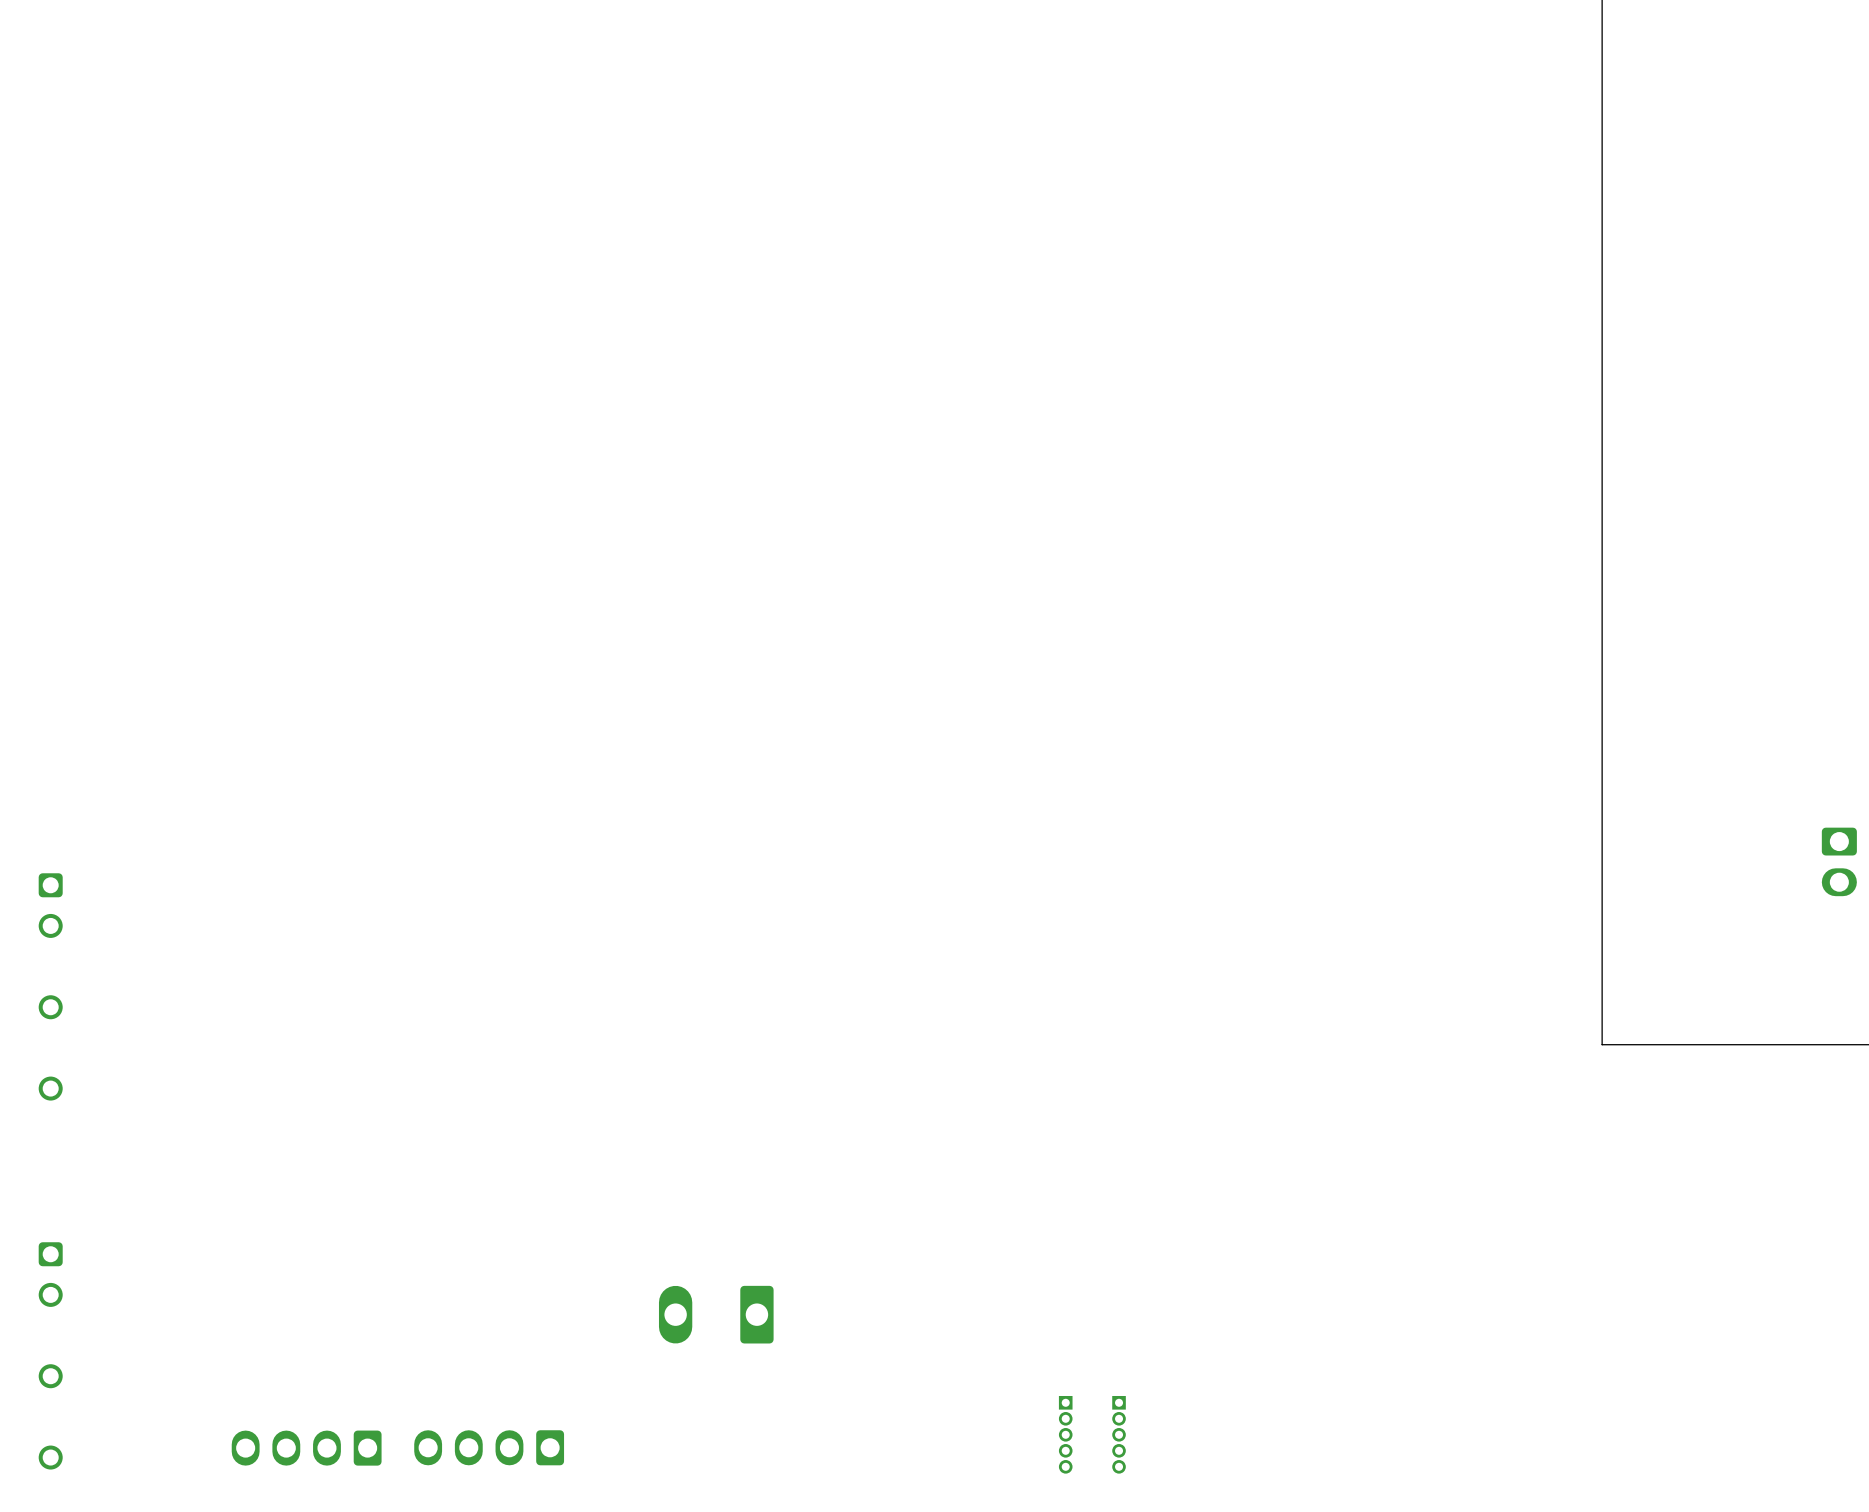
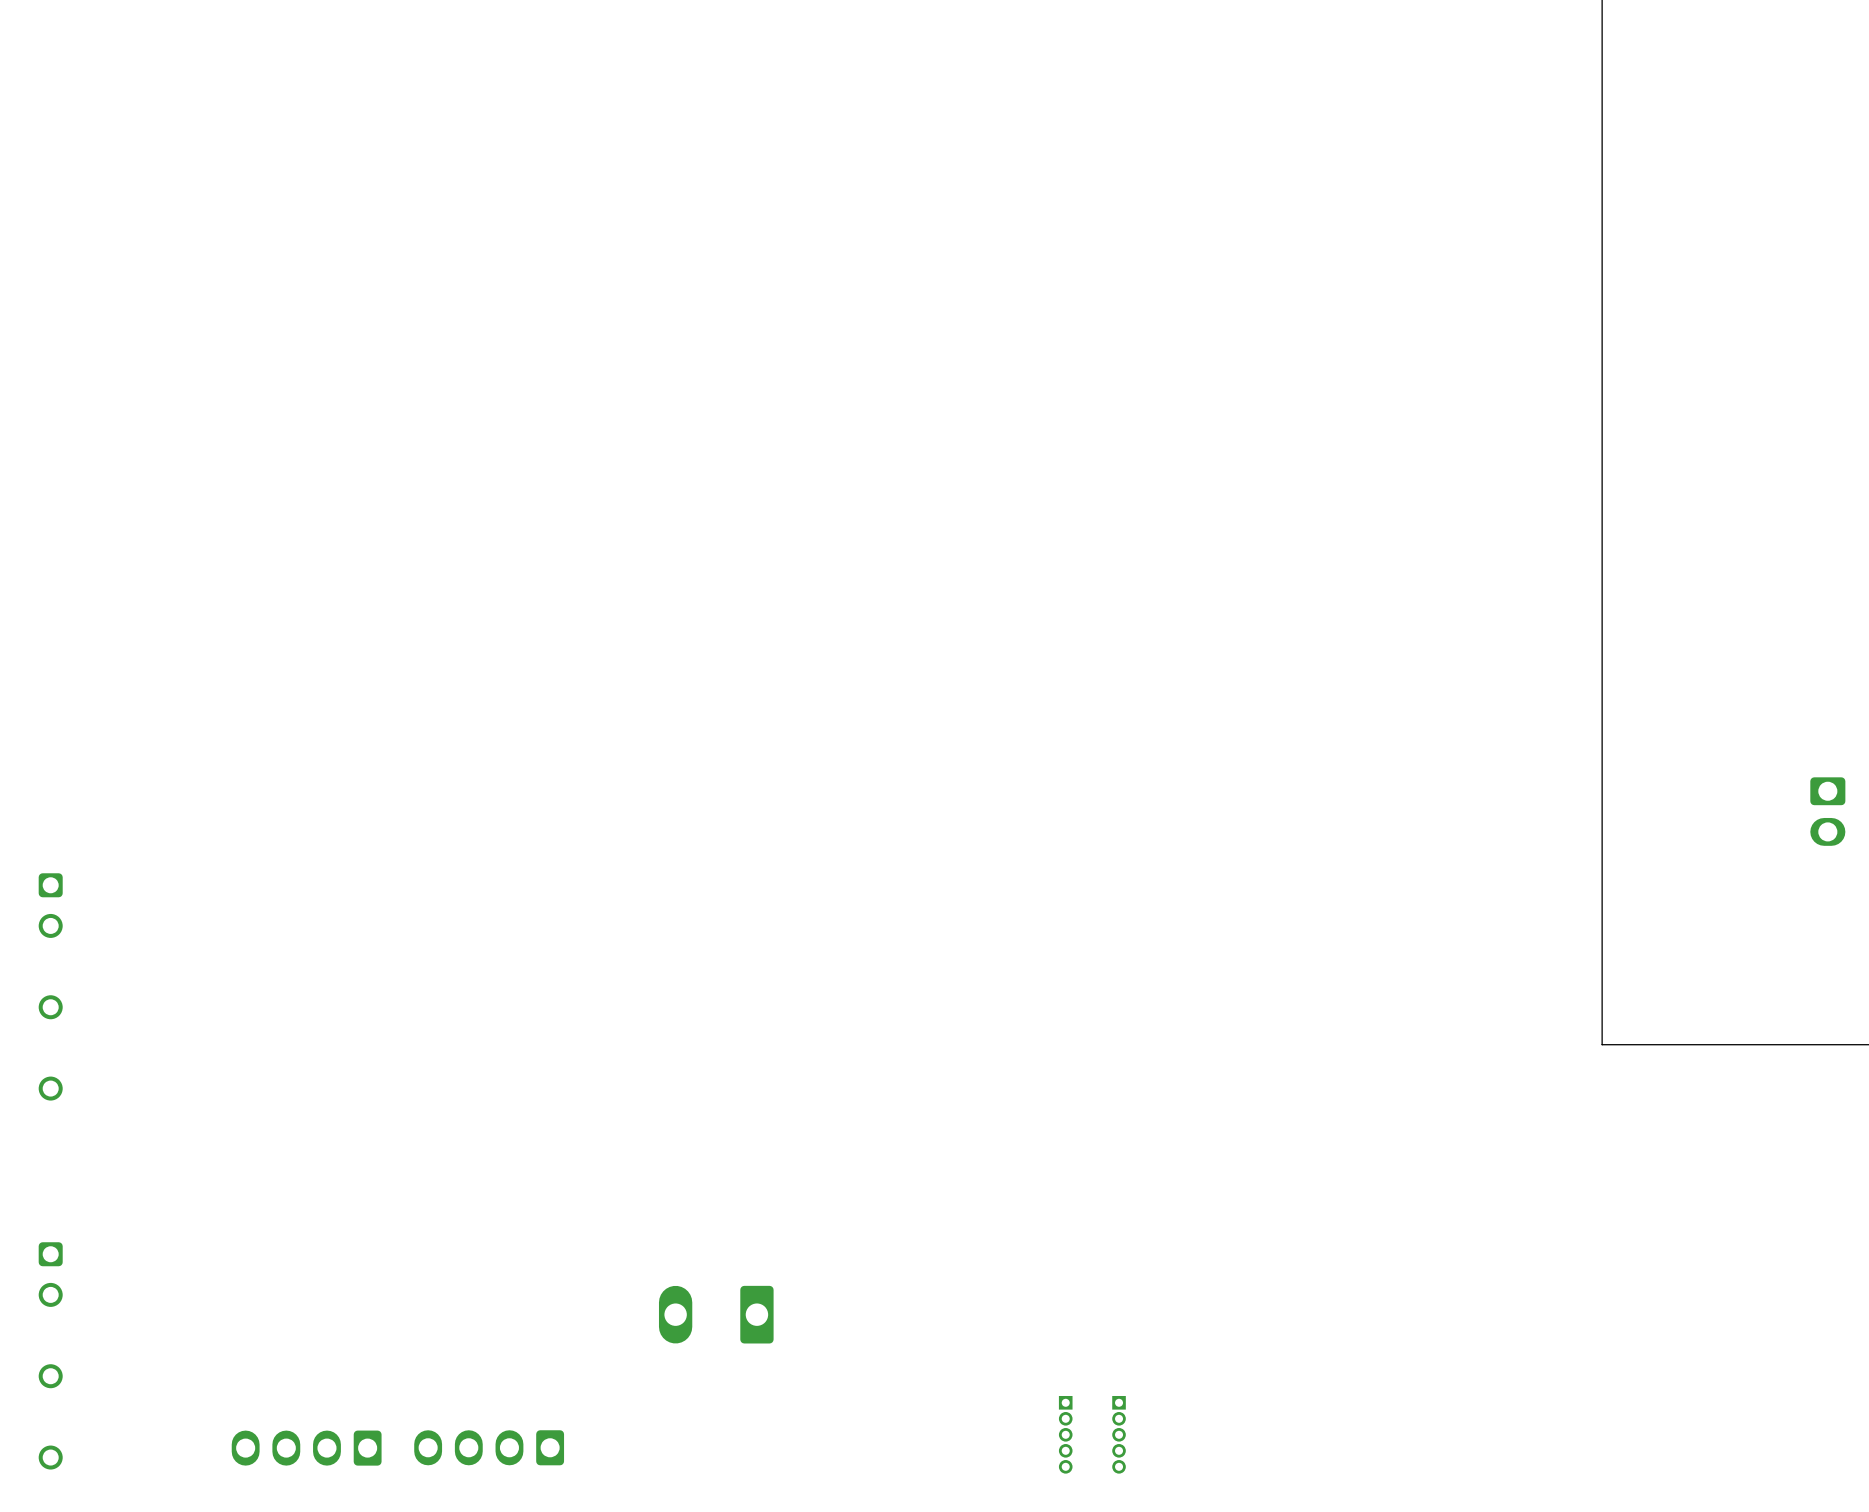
part position: (1839, 861) -> (1827, 811)

